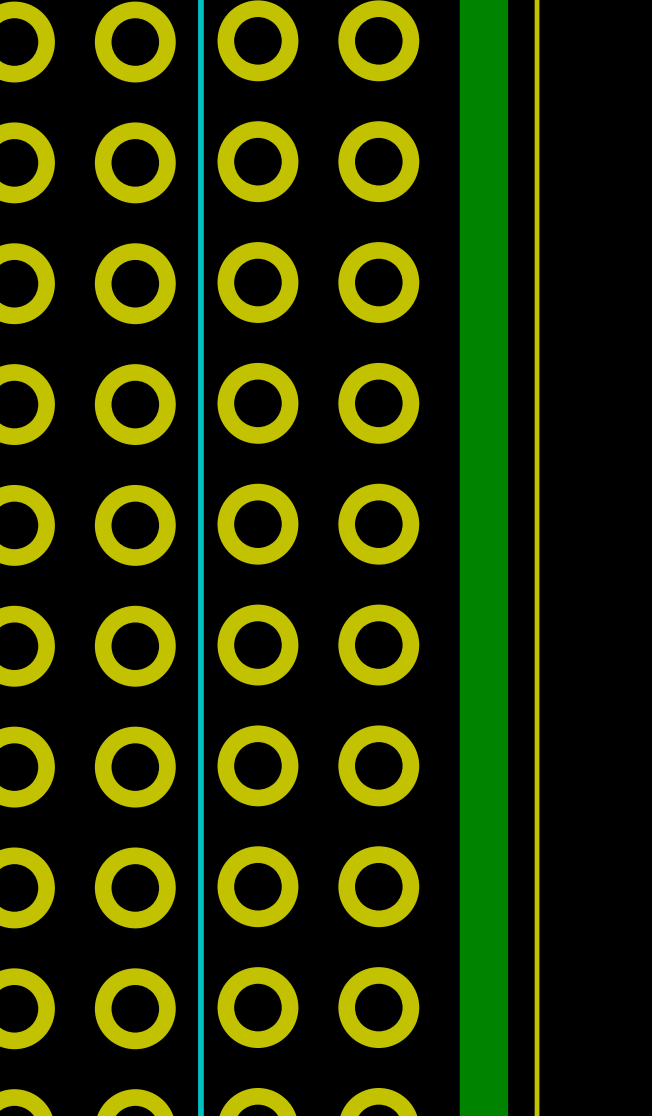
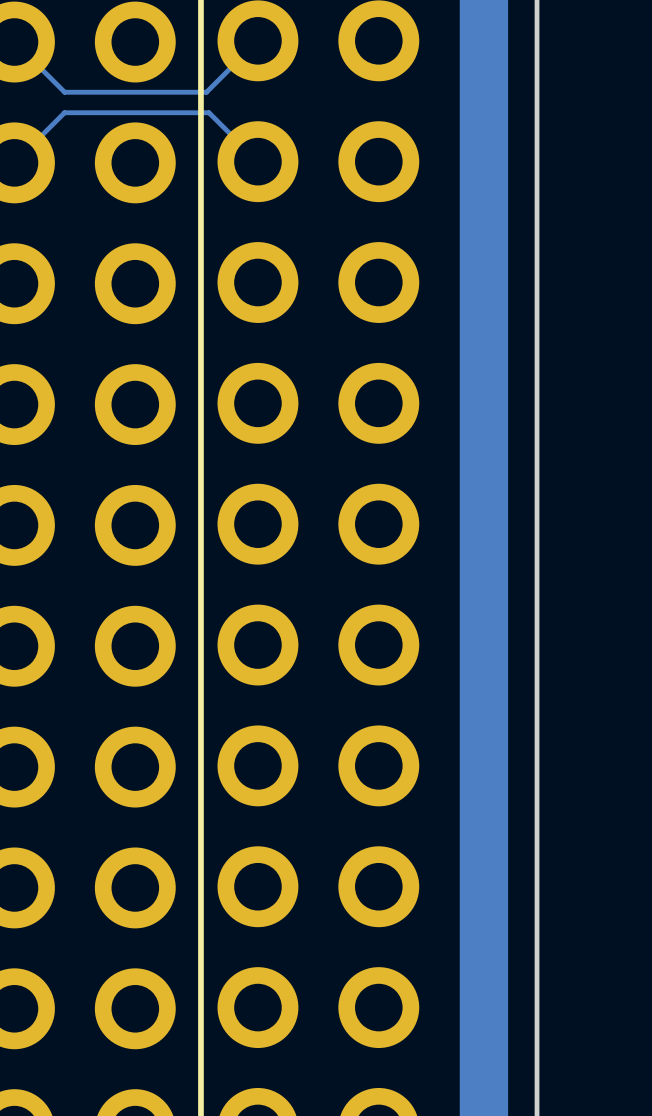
track: none -> (257, 40) (206, 92) (64, 92) (14, 42)
track: none -> (257, 161) (209, 112) (64, 112) (14, 162)

